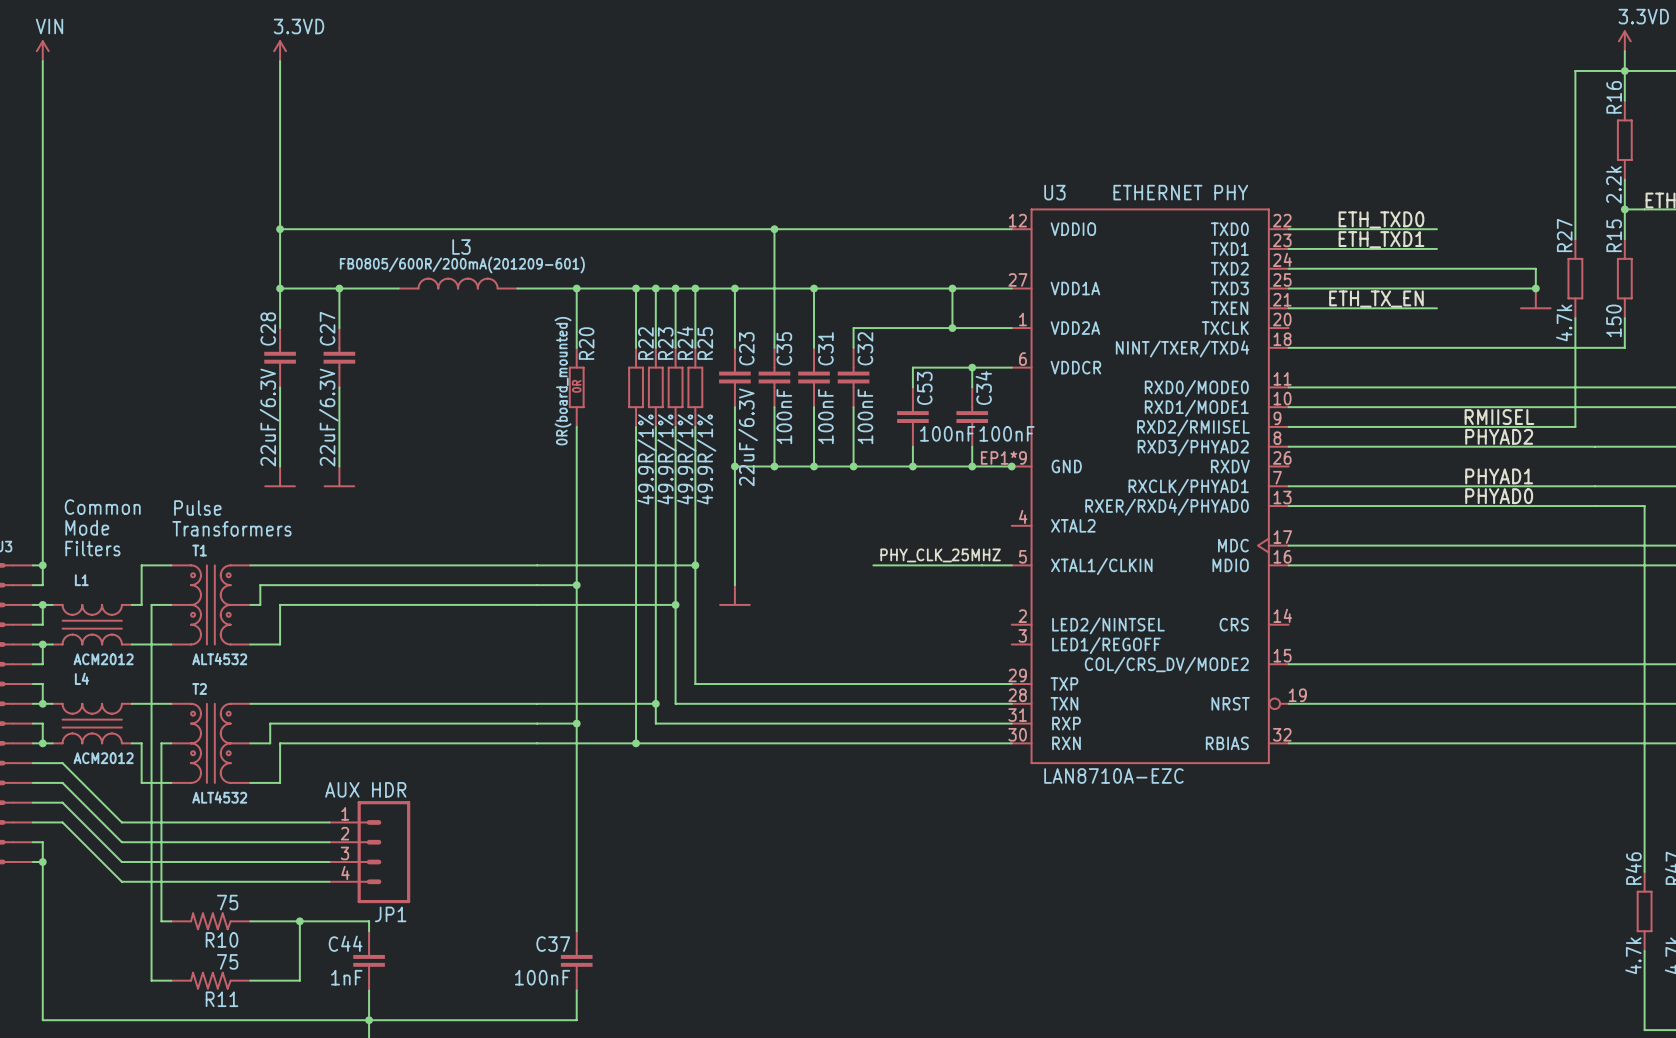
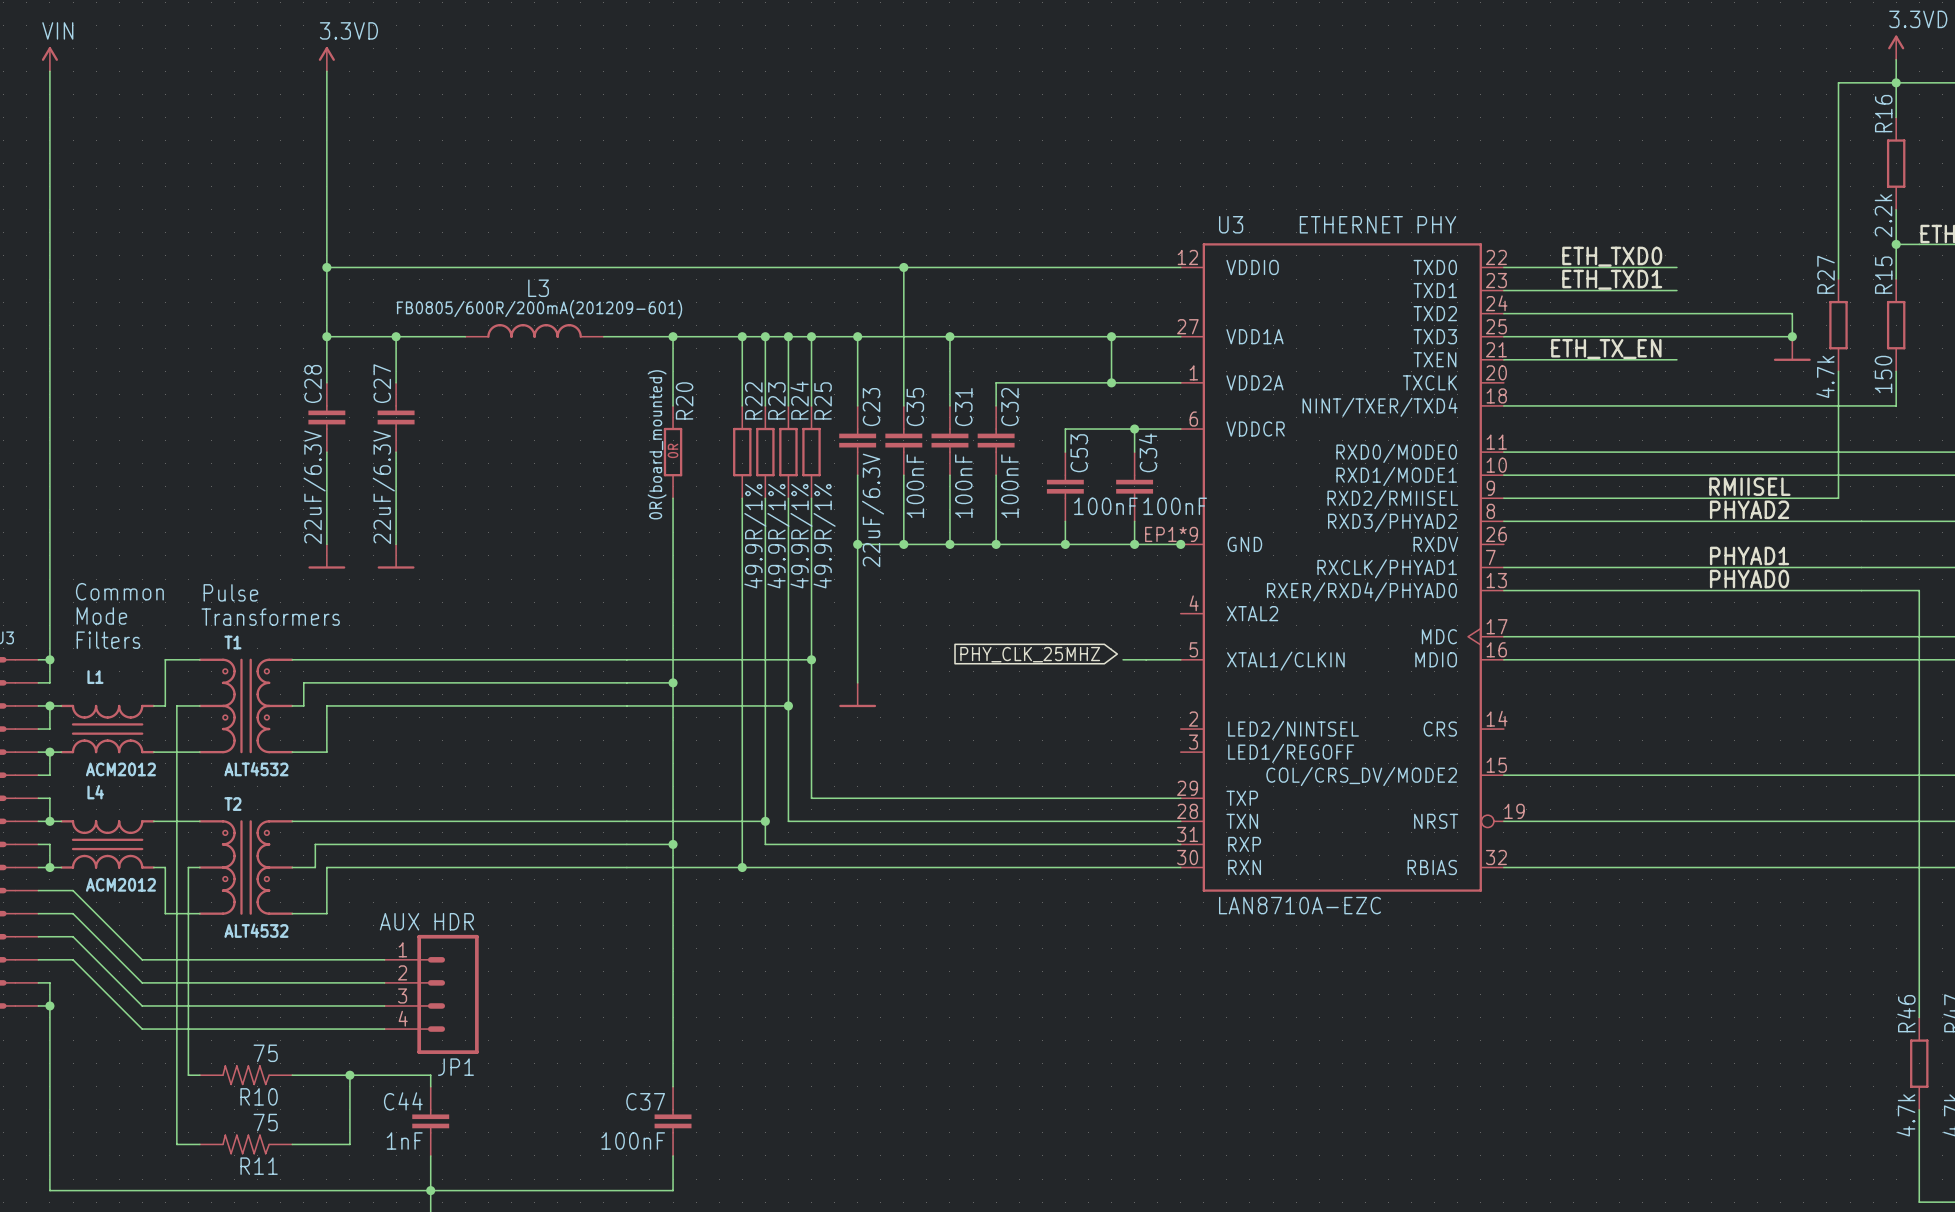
label: PHY_CLK_25MHZ (940, 555) -> none
global label: none -> PHY_CLK_25MHZ (1030, 654)
wire: (873, 565) (962, 565) -> none

